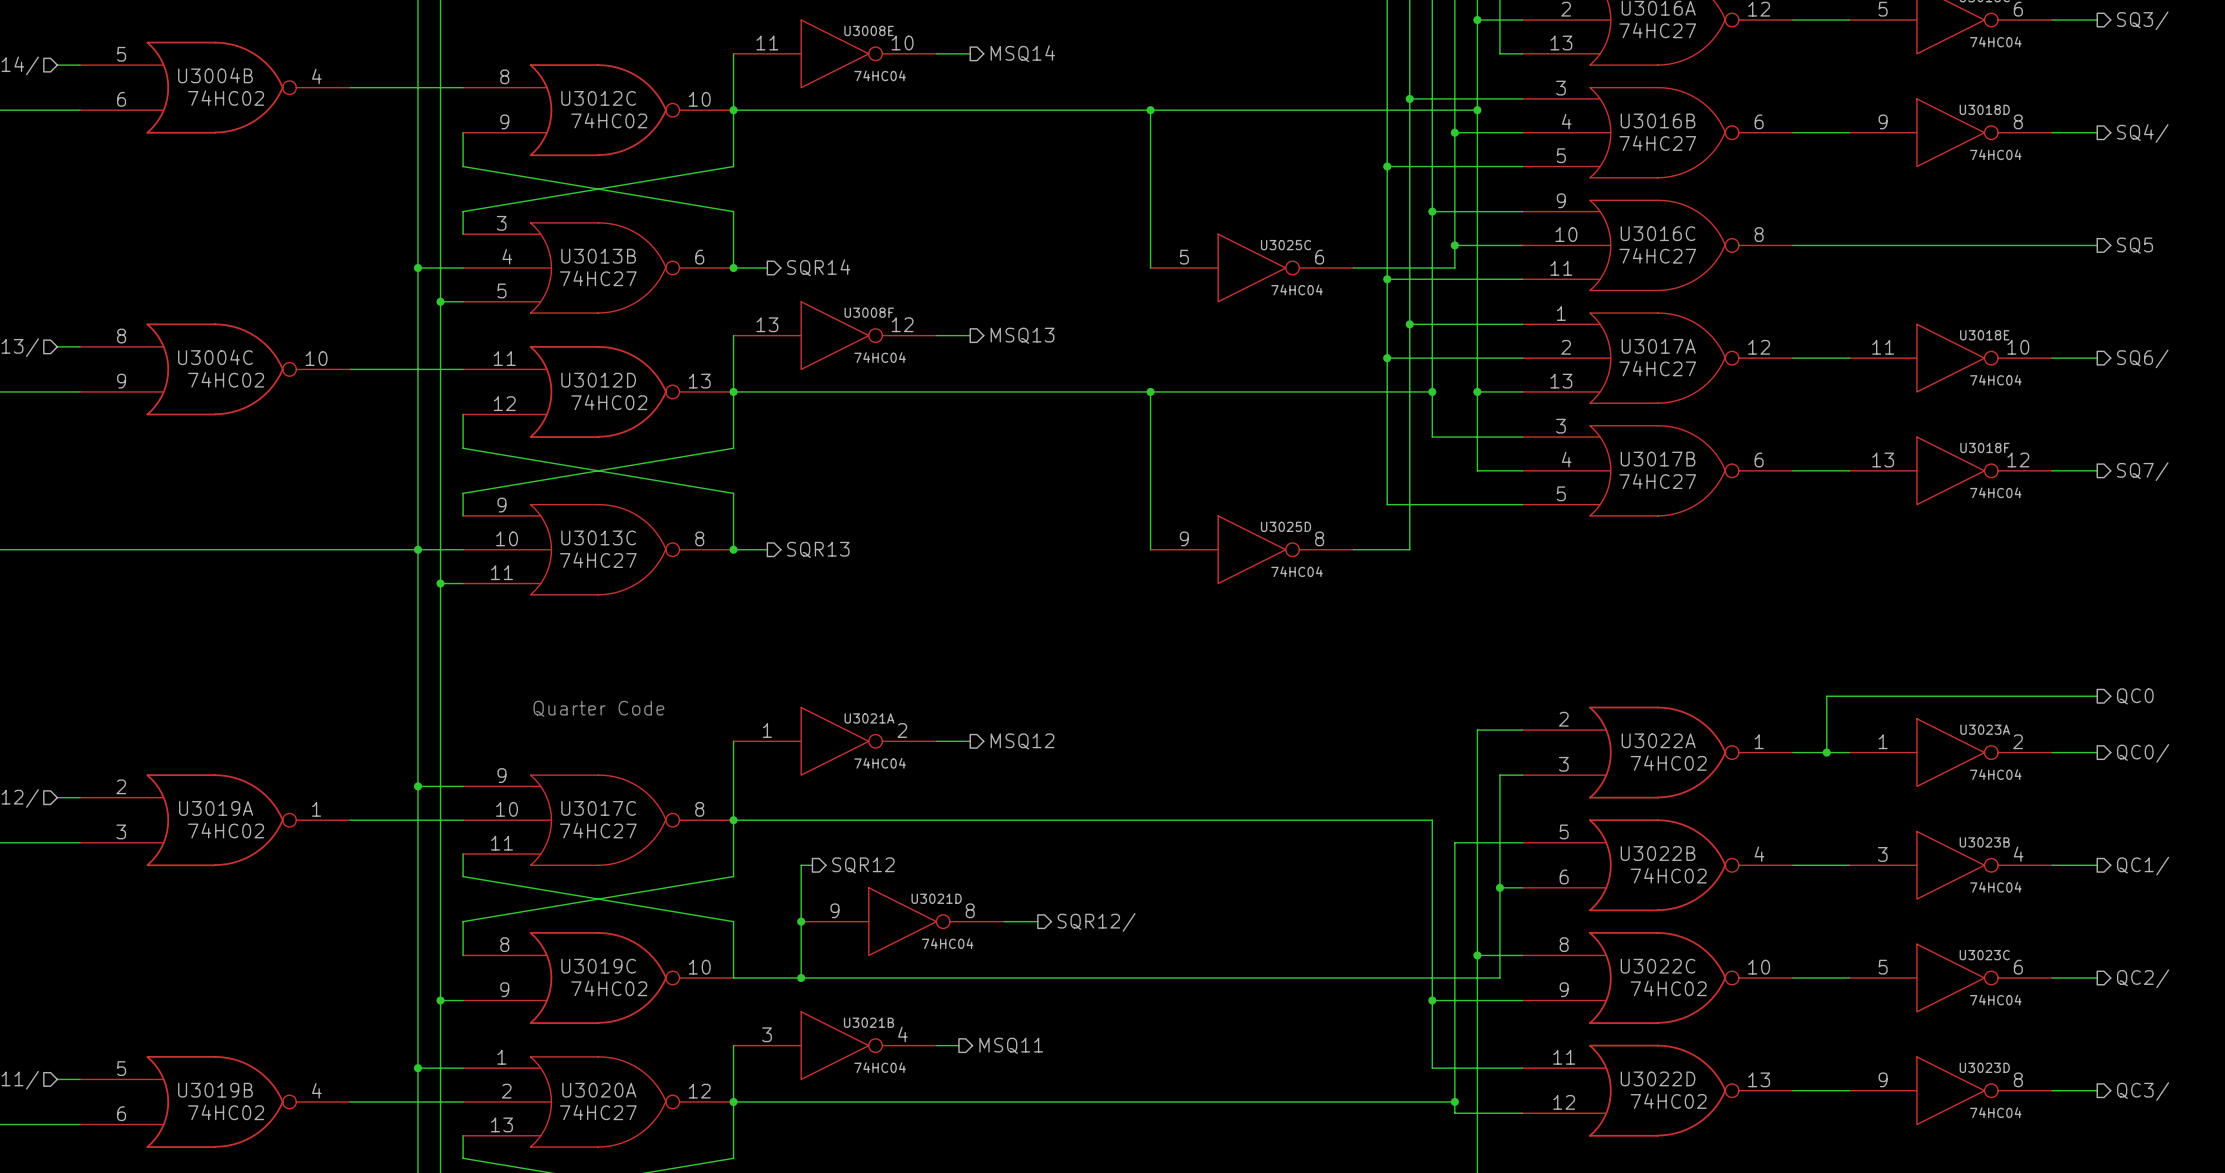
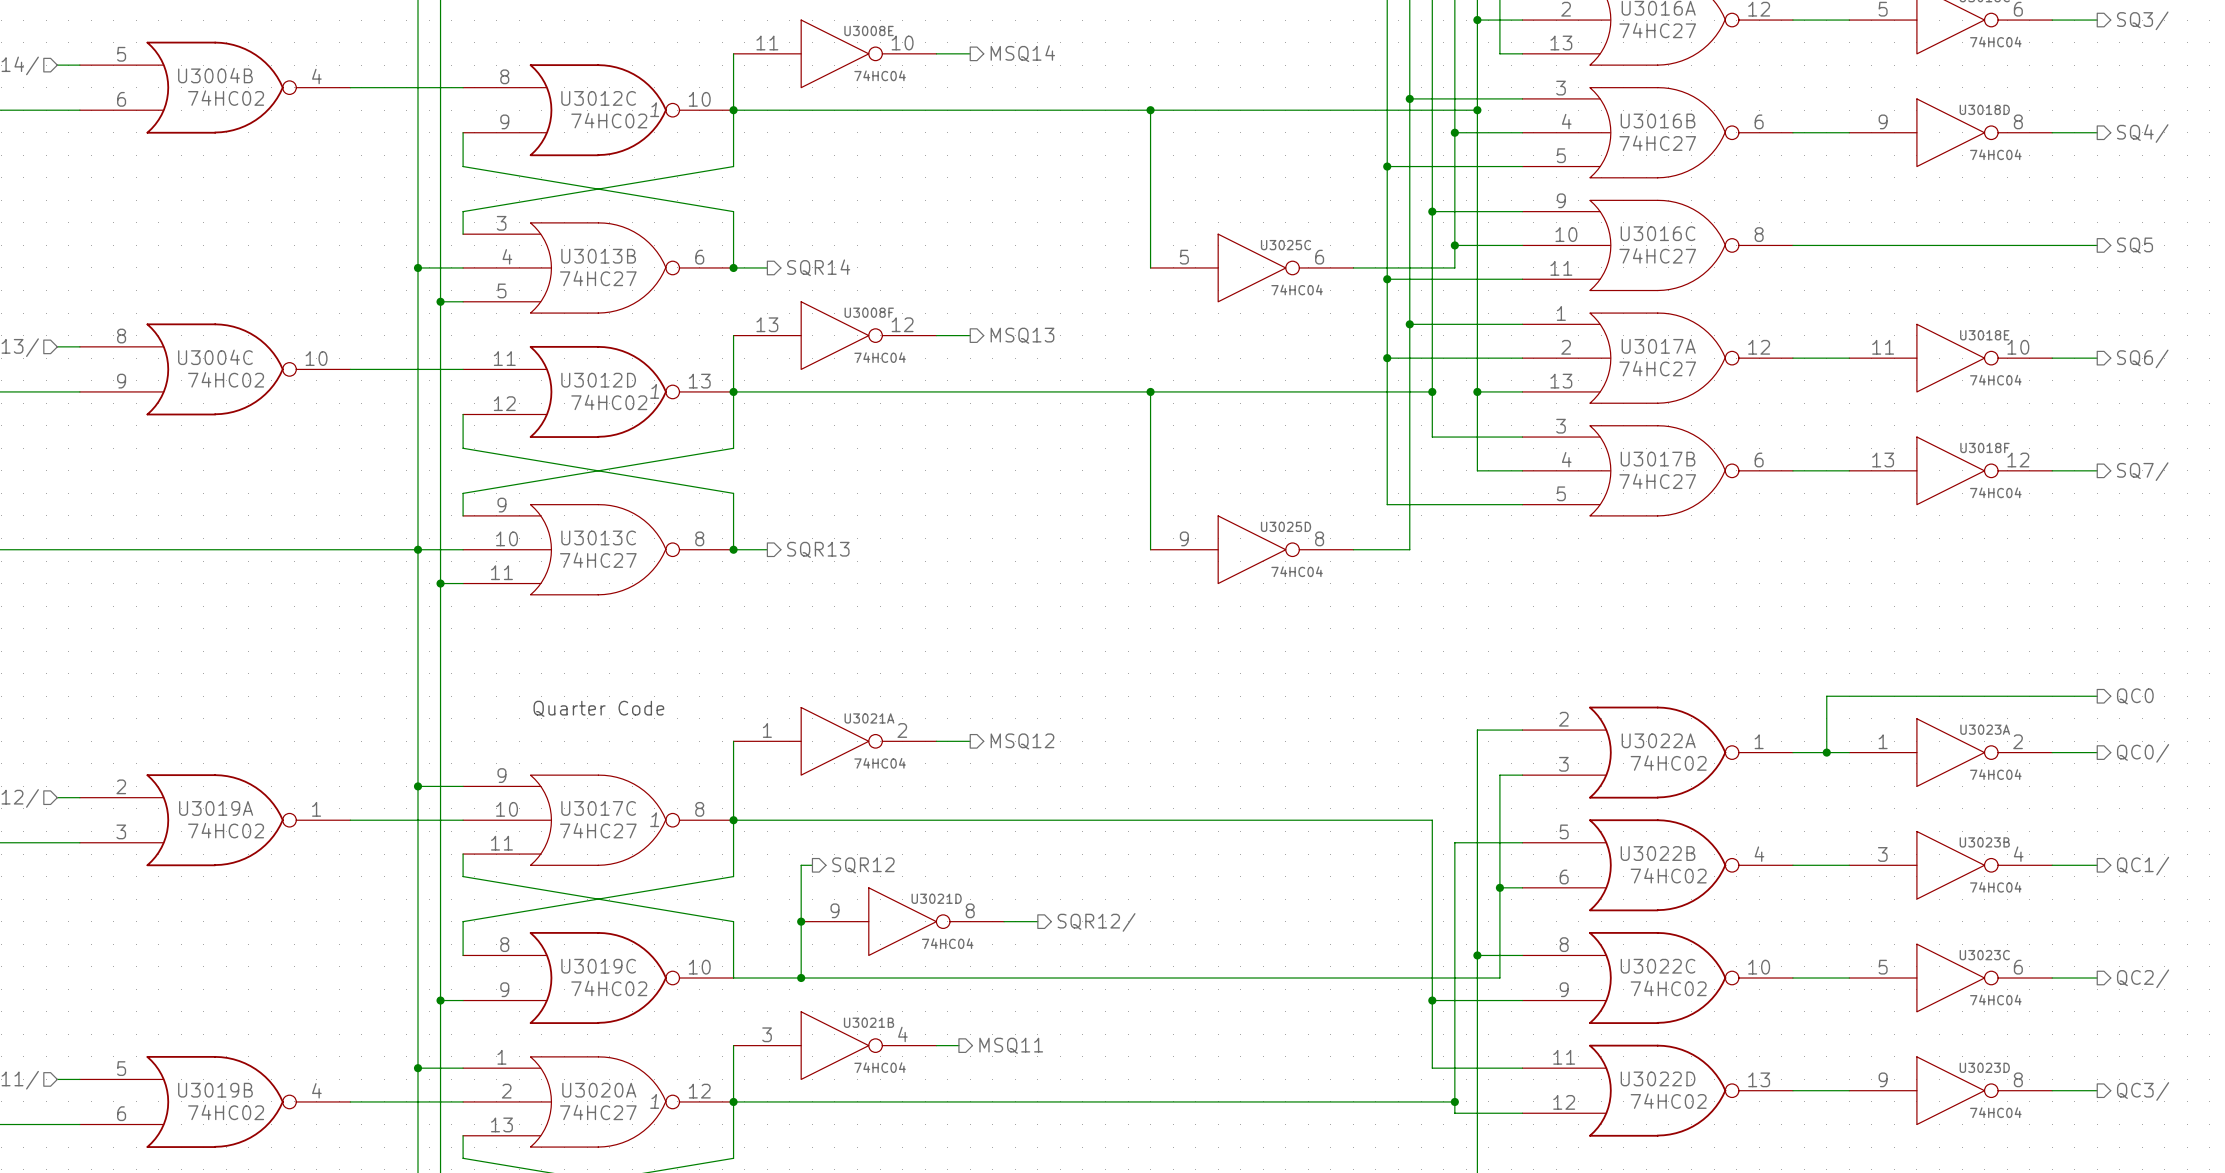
U3012C text: none -> 1 (654, 109)
U3012D text: none -> 1 (654, 391)
U3017C text: none -> 1 (654, 819)
U3020A text: none -> 1 (654, 1101)

